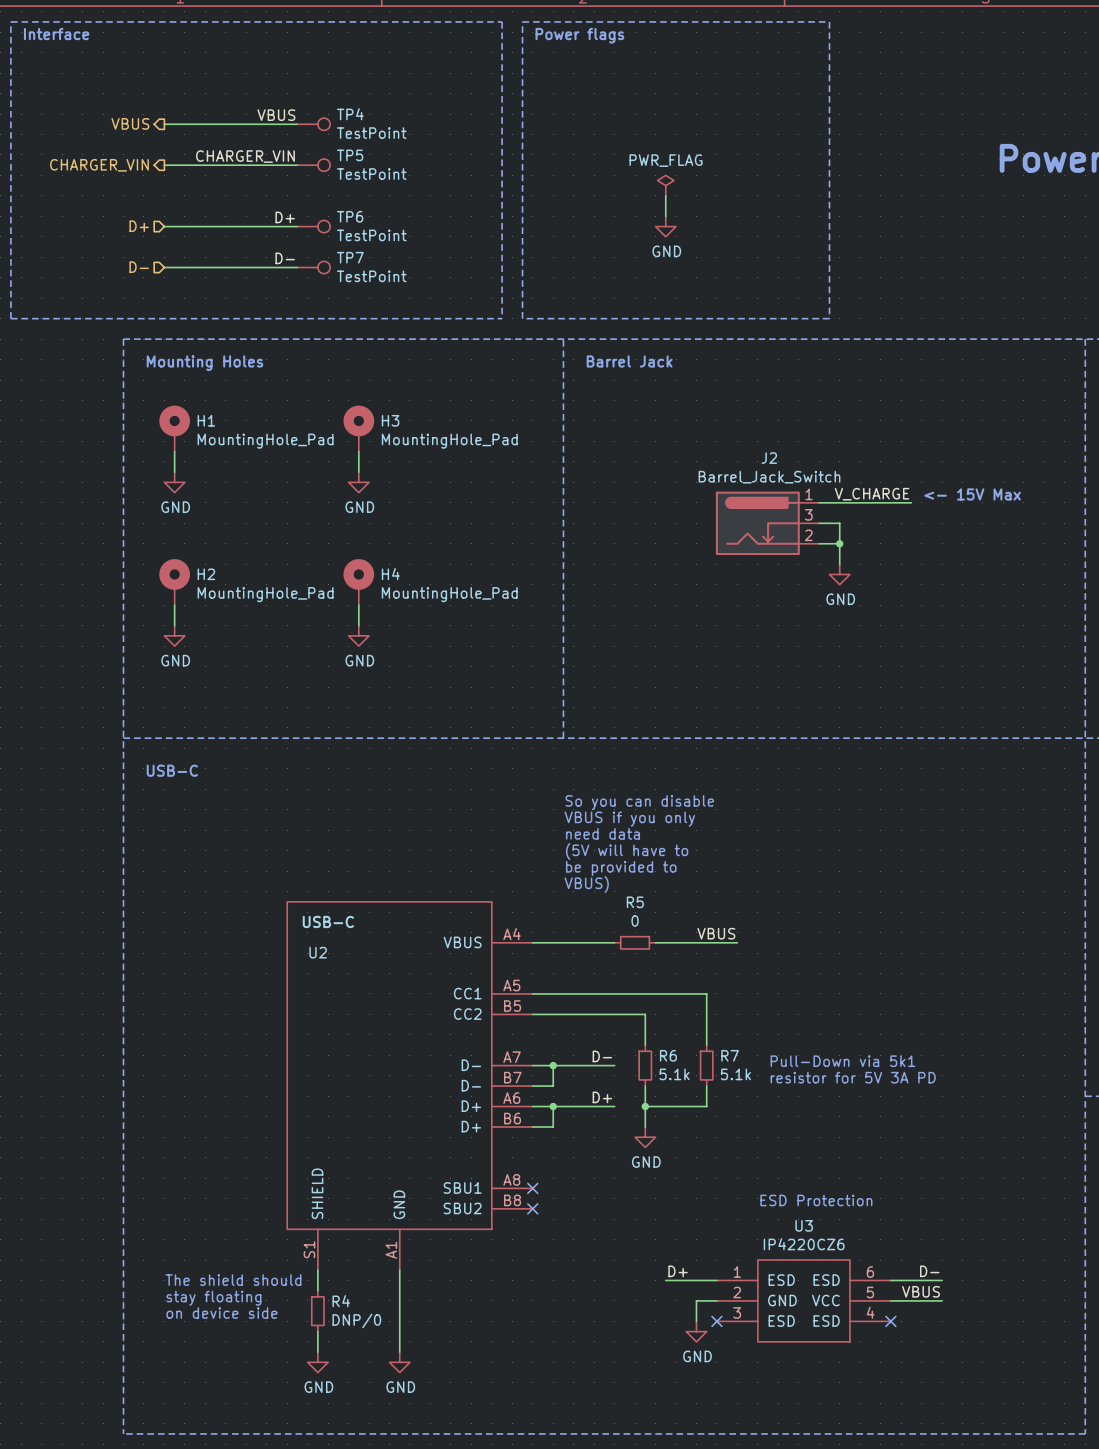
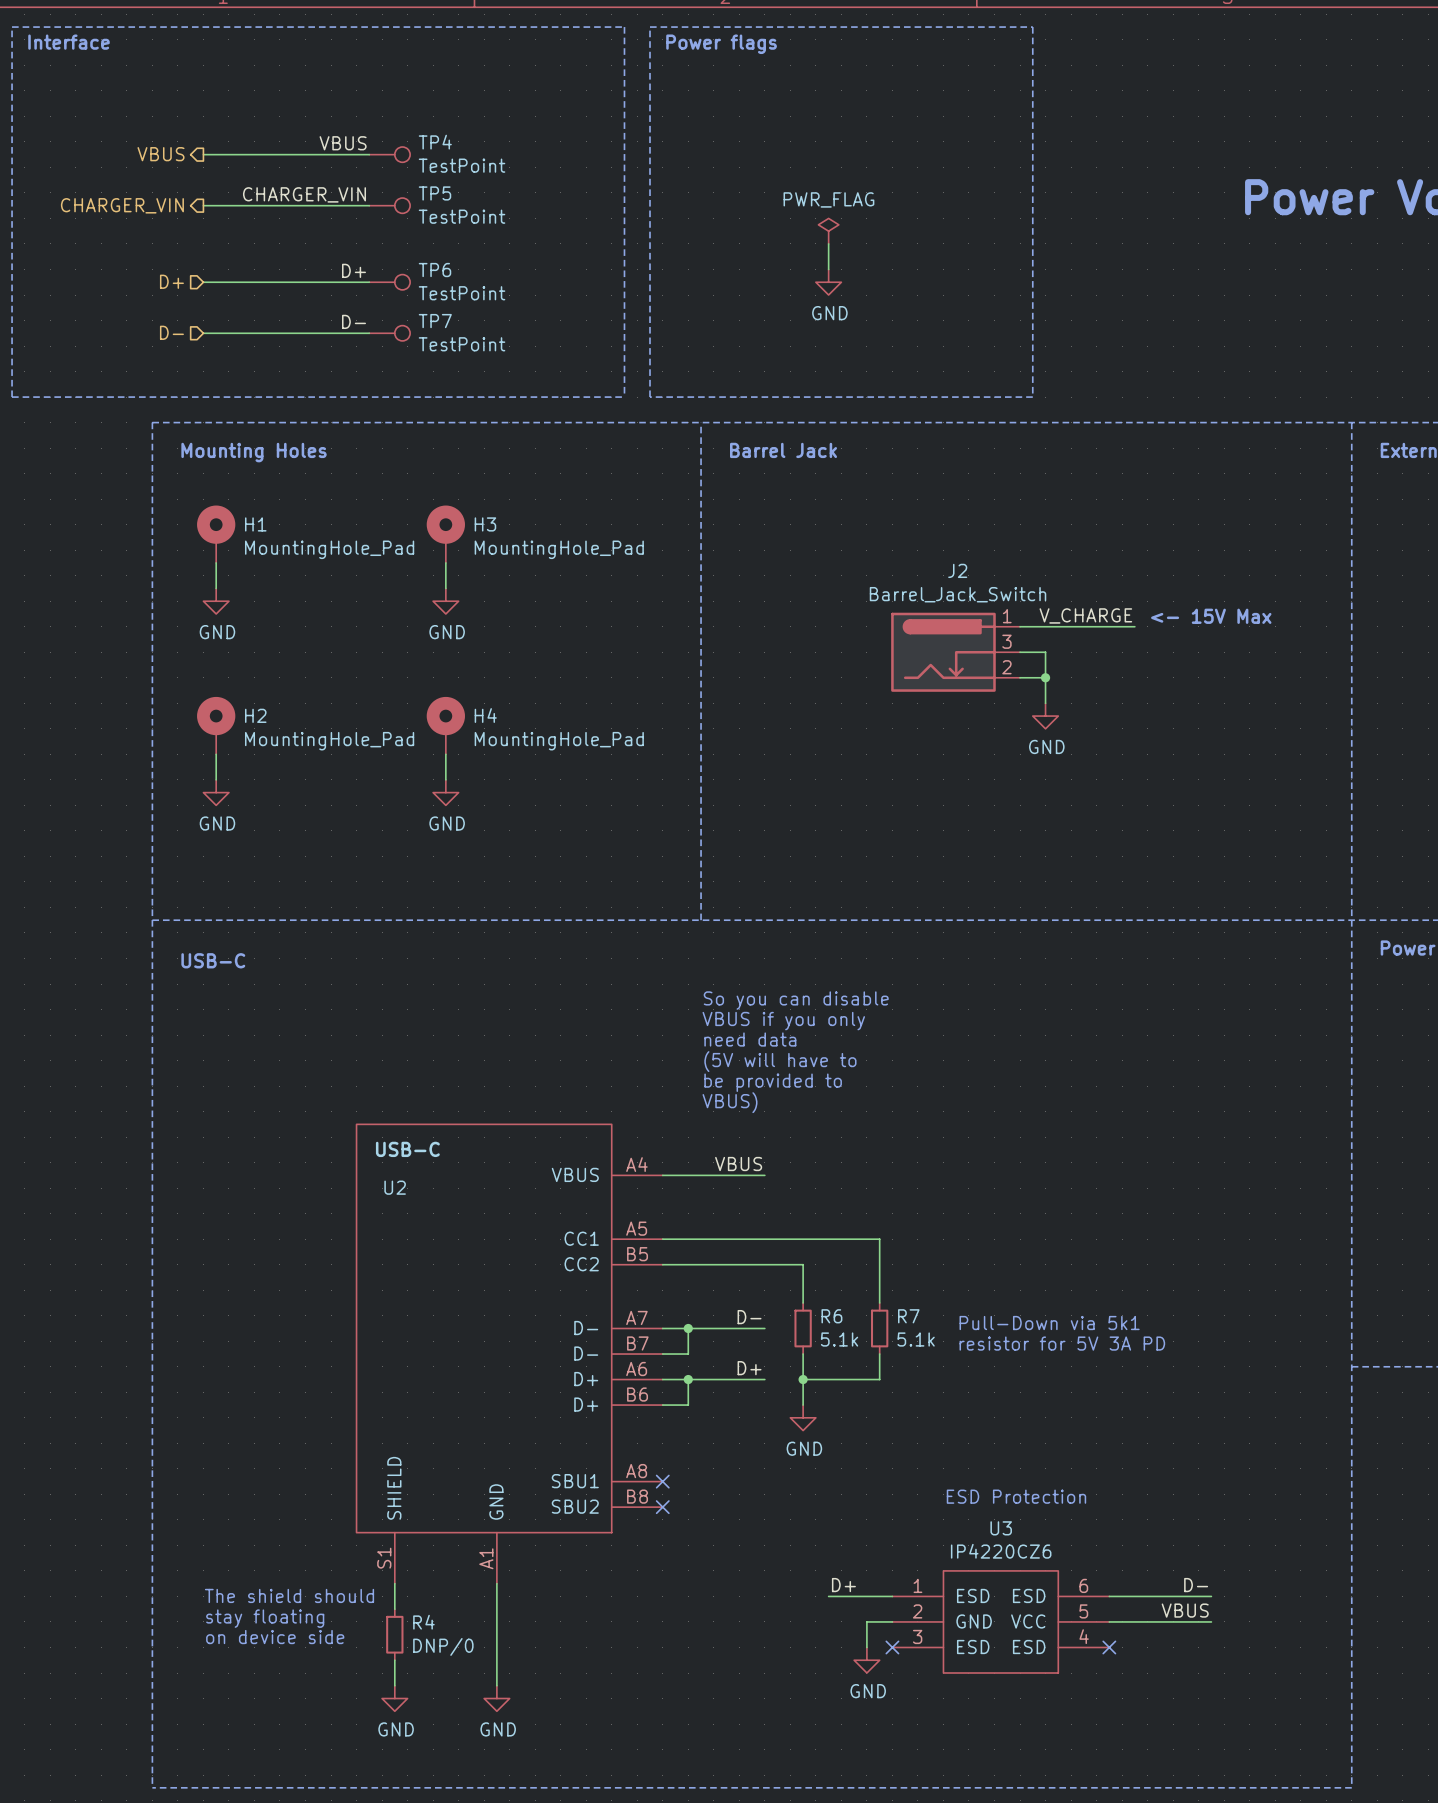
label position: VBUS (716, 933) -> VBUS (738, 1164)
R5: 0 (635, 942) -> none
wire: (655, 942) (737, 942) -> none
label position: D- (929, 1271) -> D- (1196, 1585)
wire: none -> (1173, 1596) (1211, 1596)
label position: VBUS (921, 1291) -> VBUS (1185, 1610)
wire: none -> (1173, 1621) (1211, 1621)

